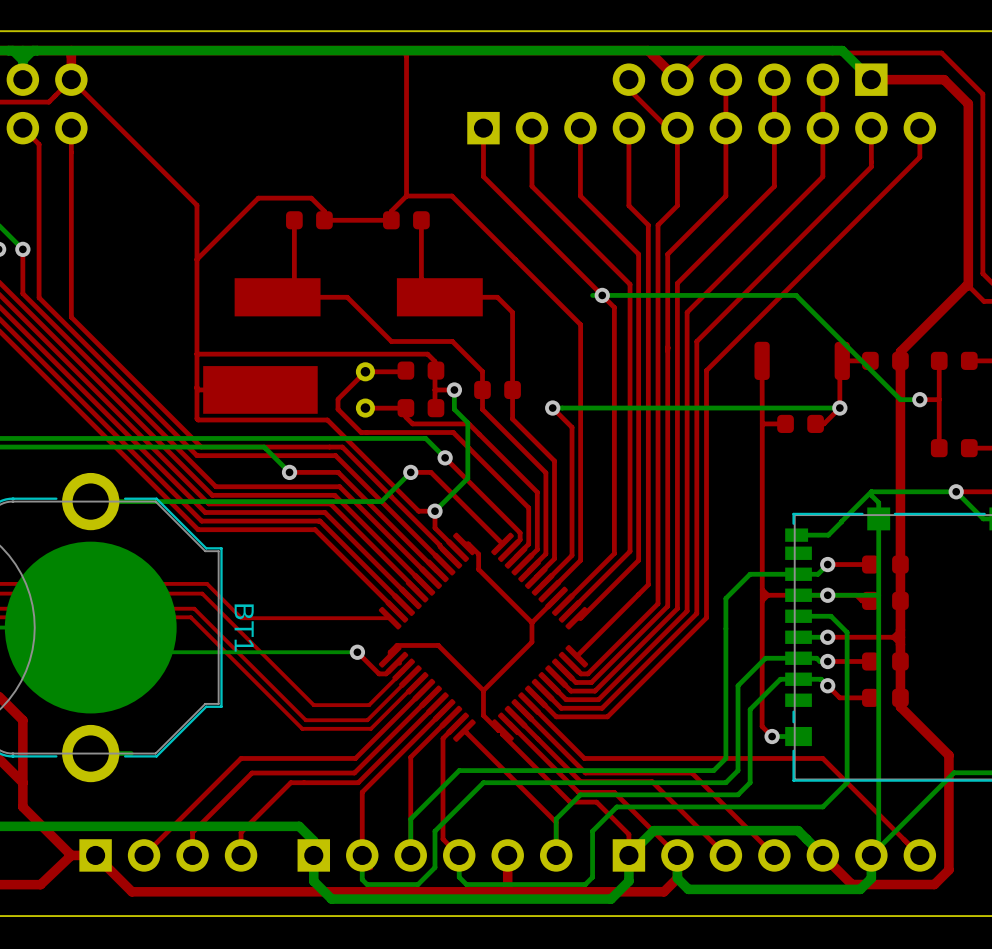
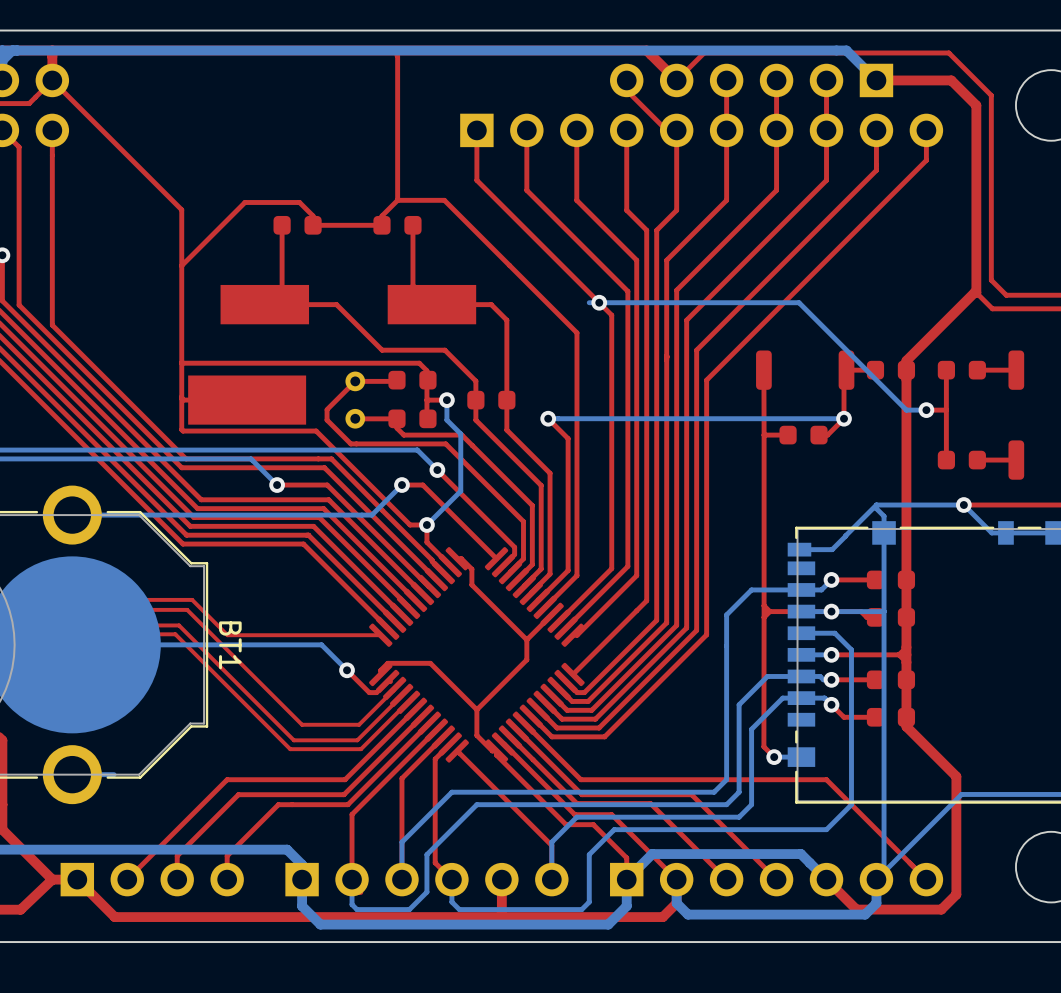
bottom track: (357, 652) (115, 652) -> (347, 670) (321, 644) (72, 644)

